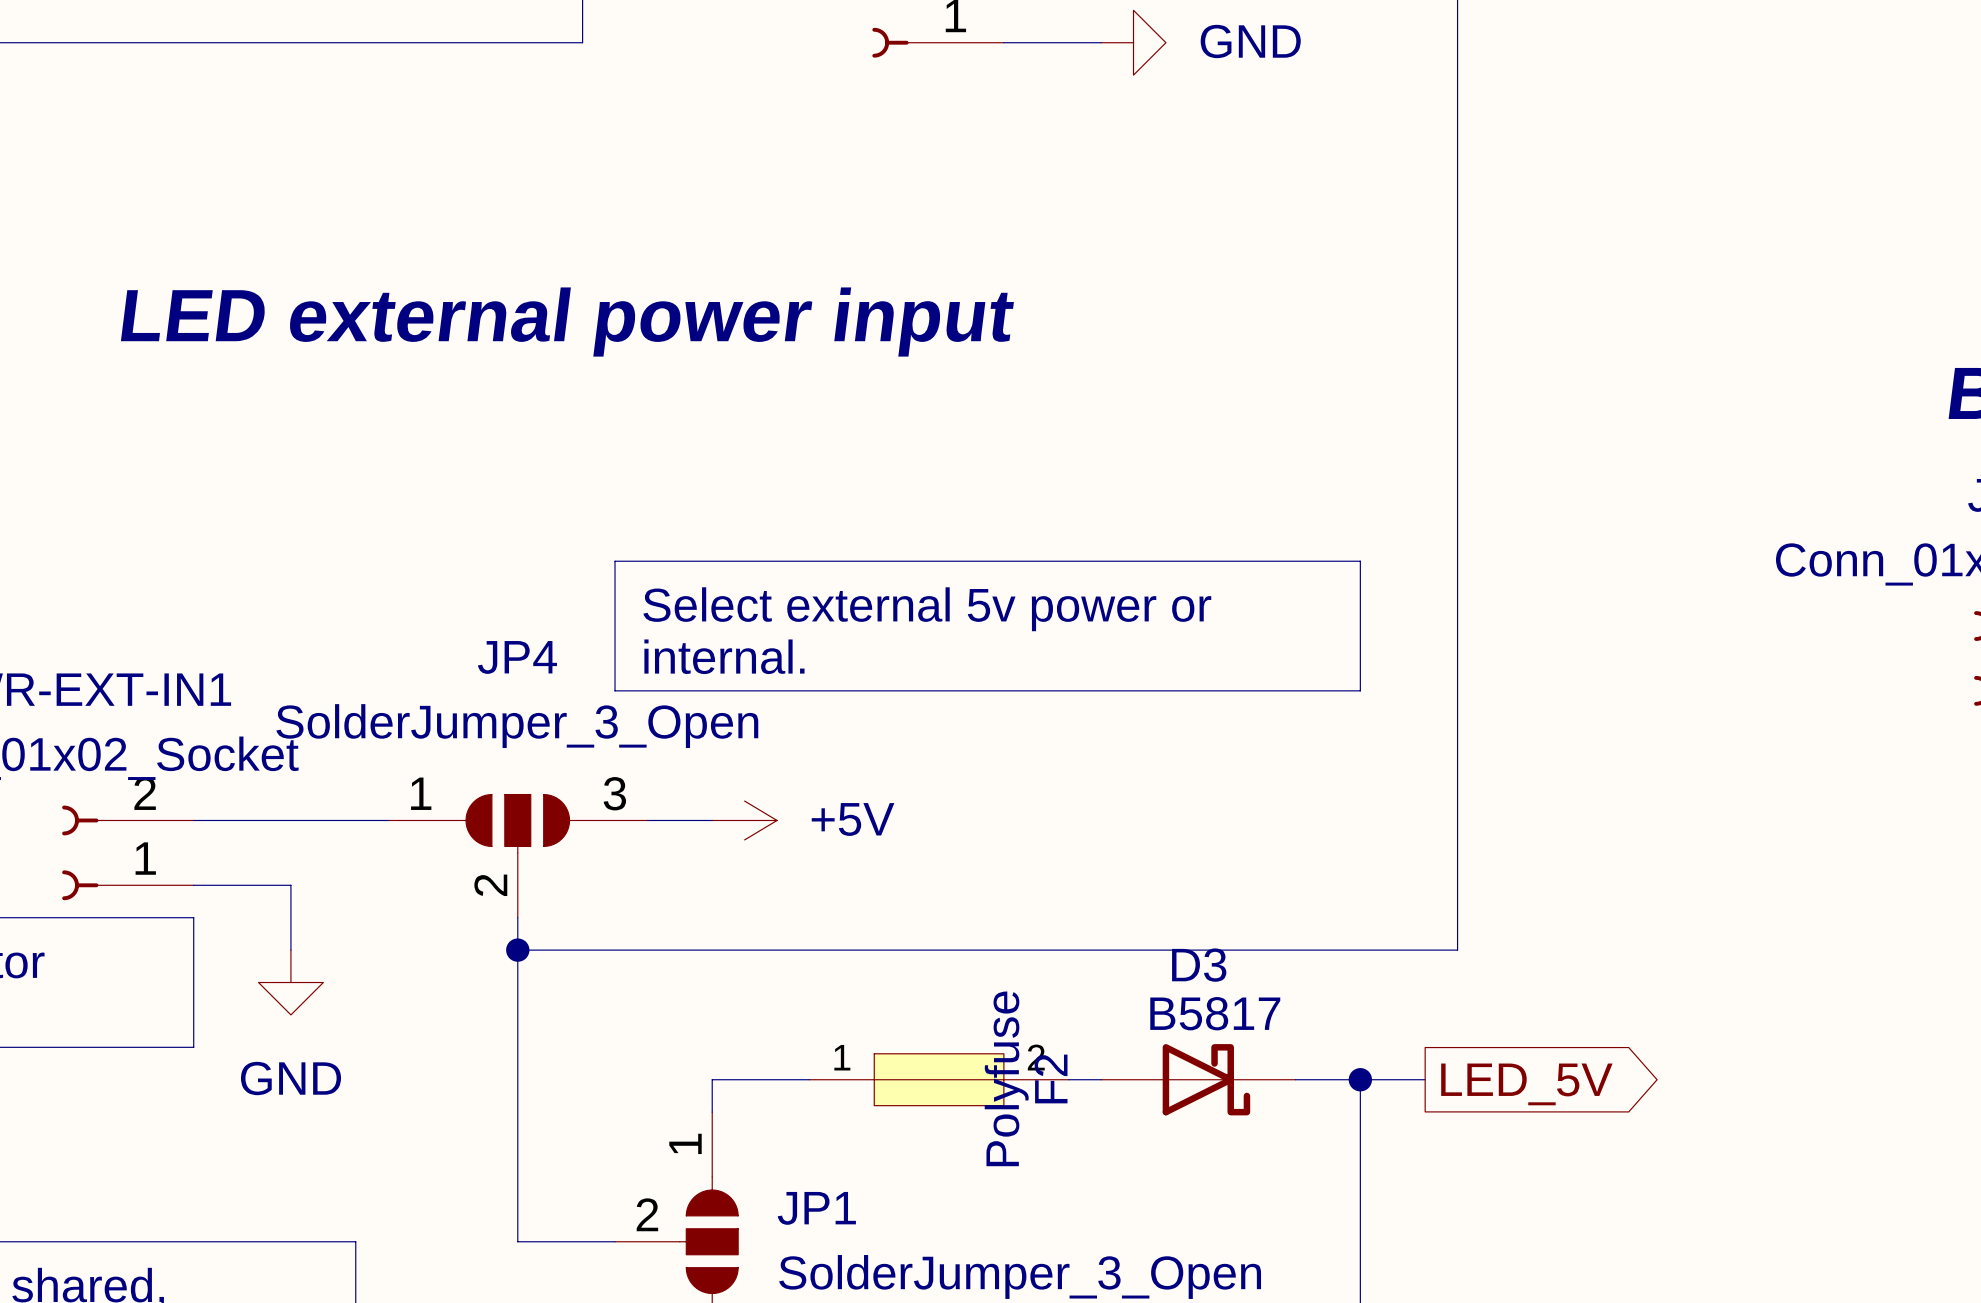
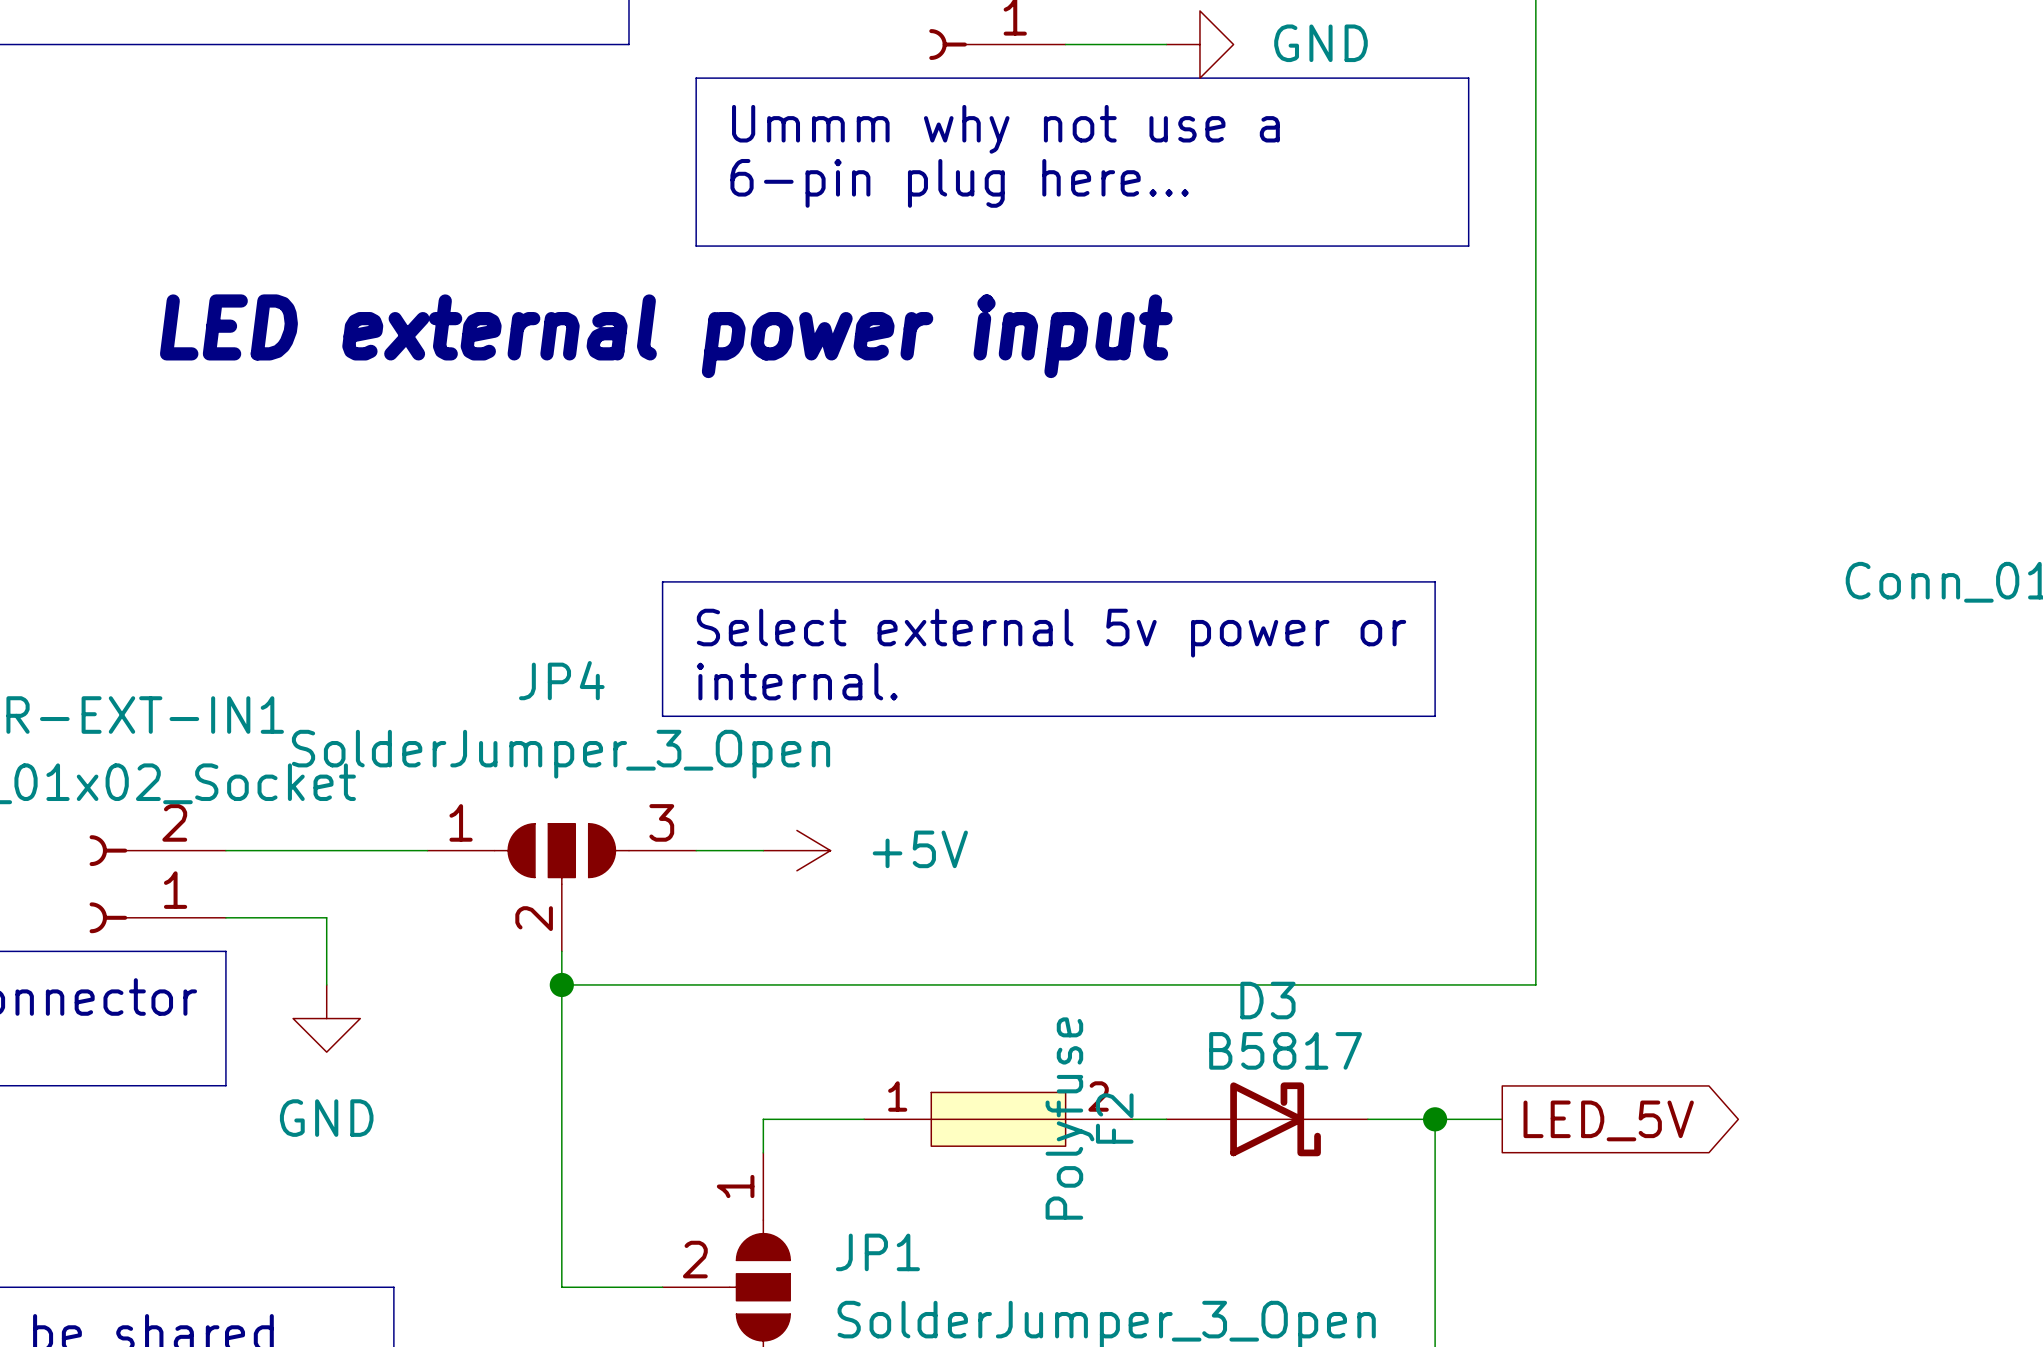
line: none -> (696, 78) (1468, 78) (1468, 246) (696, 246) (696, 78)
text: none -> Ummm why not use a (1005, 129)
text: none -> 6-pin plug here... (959, 183)

